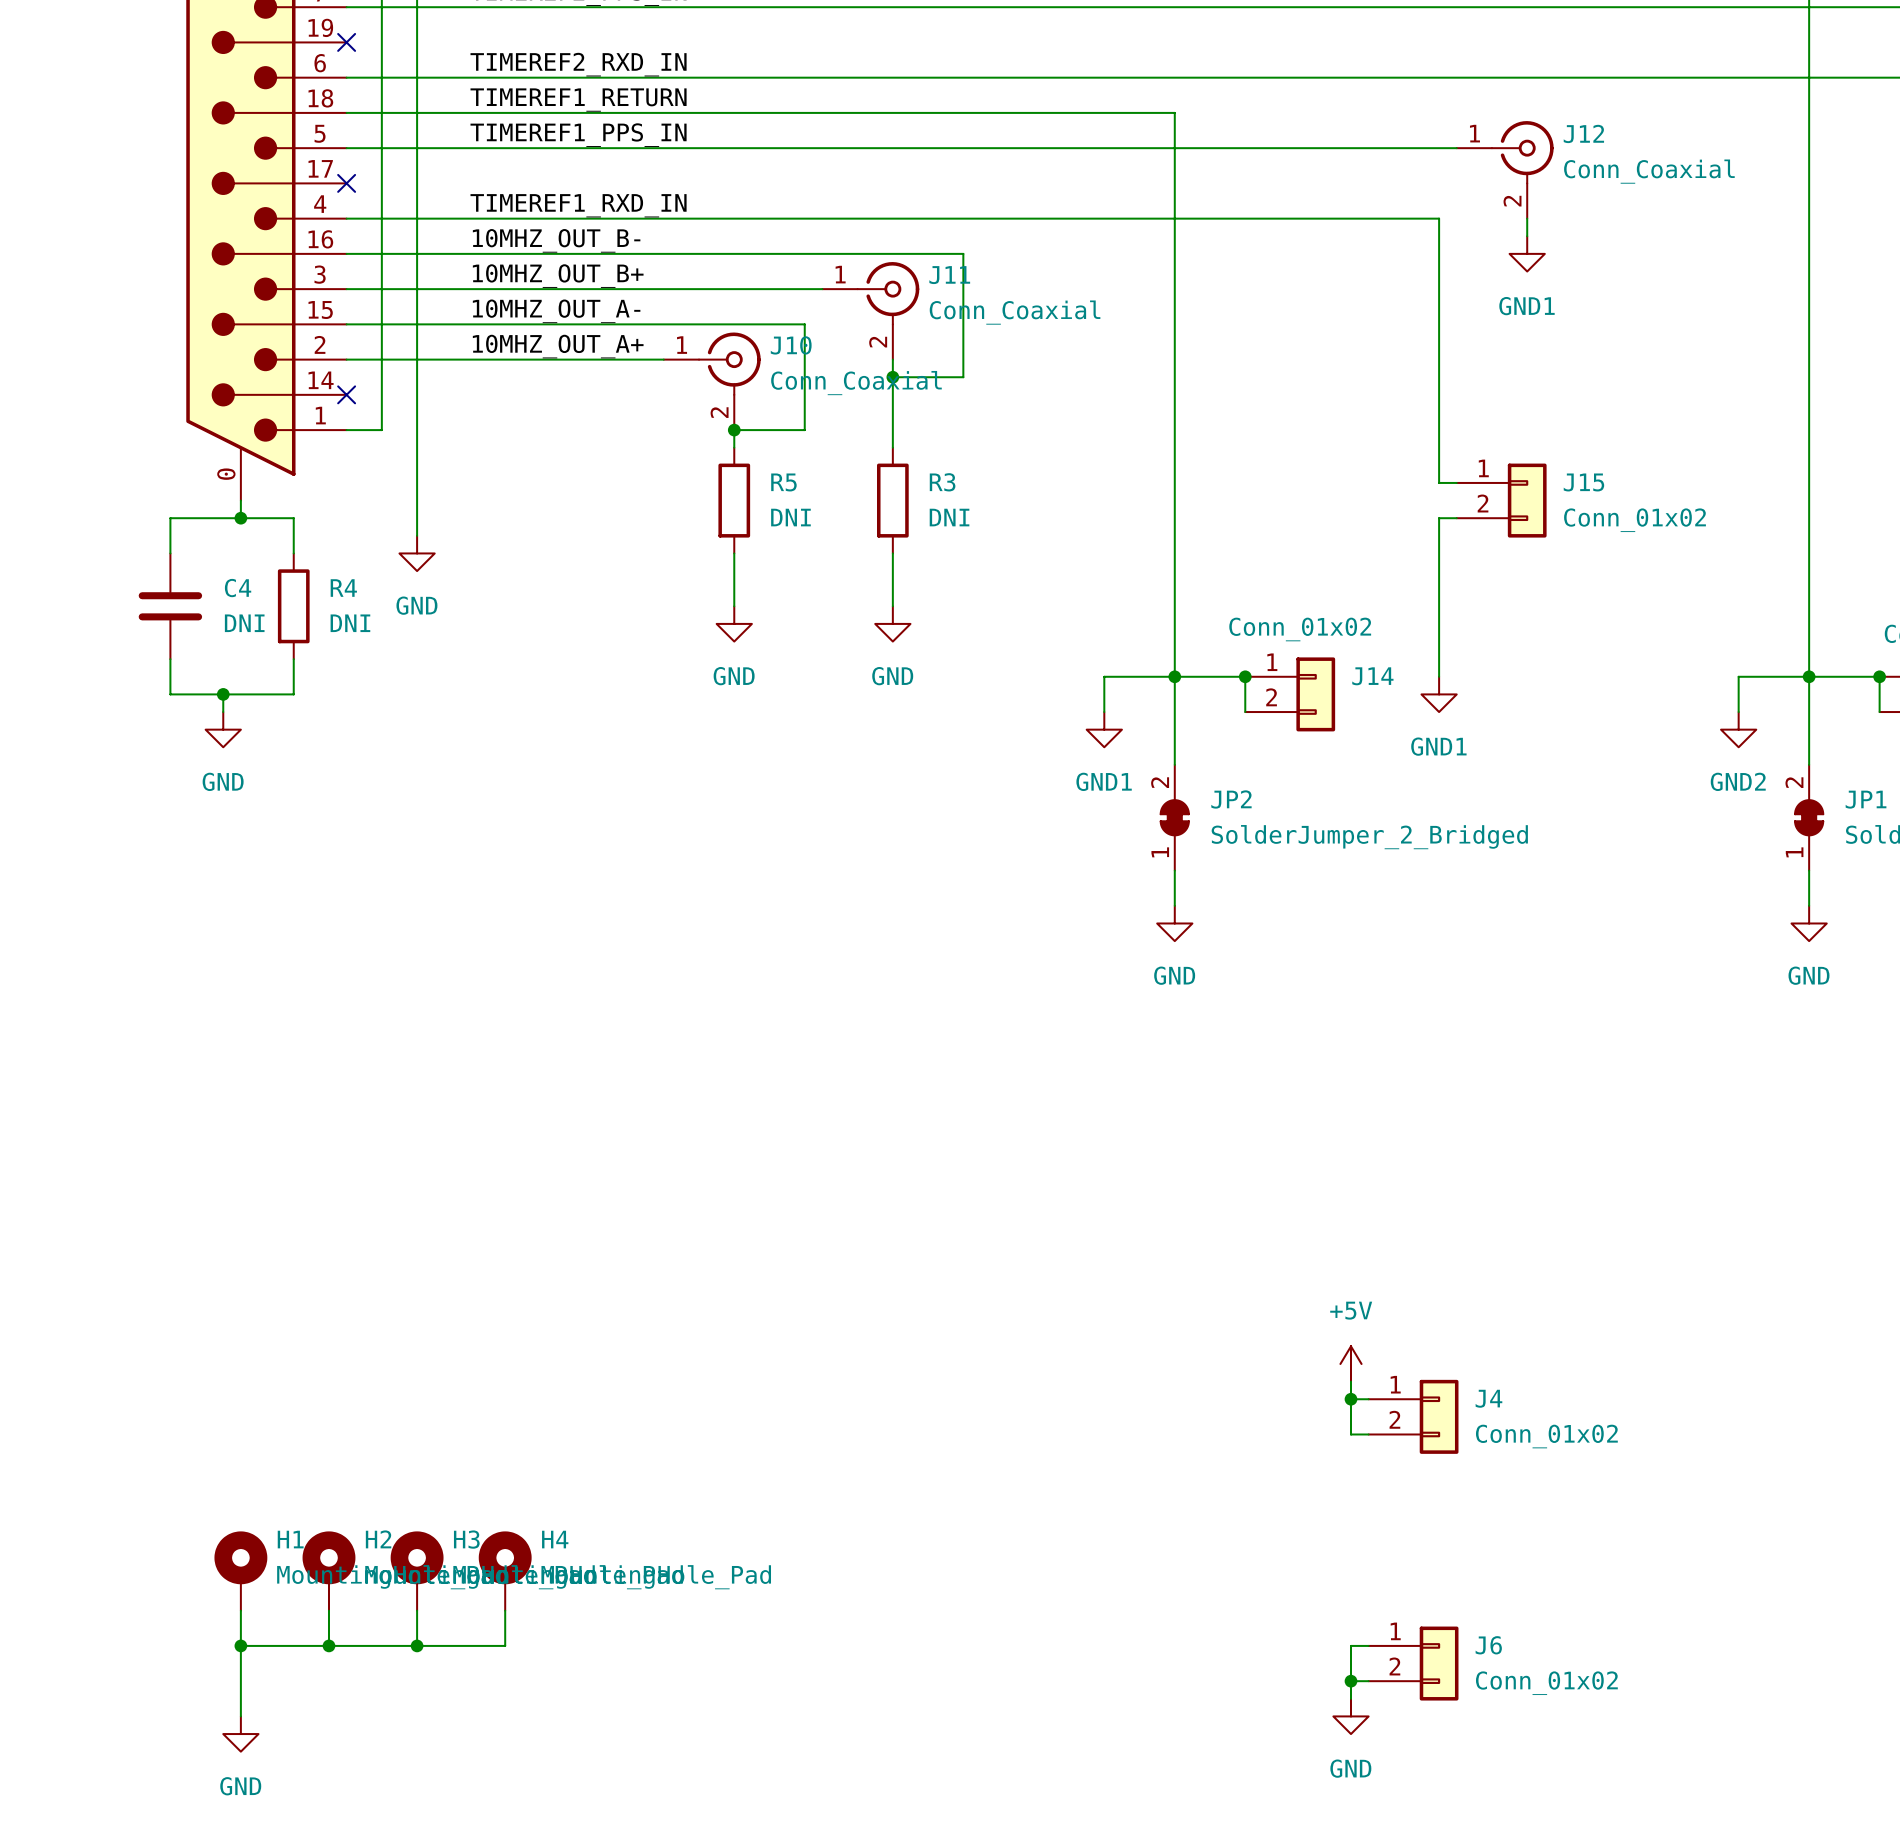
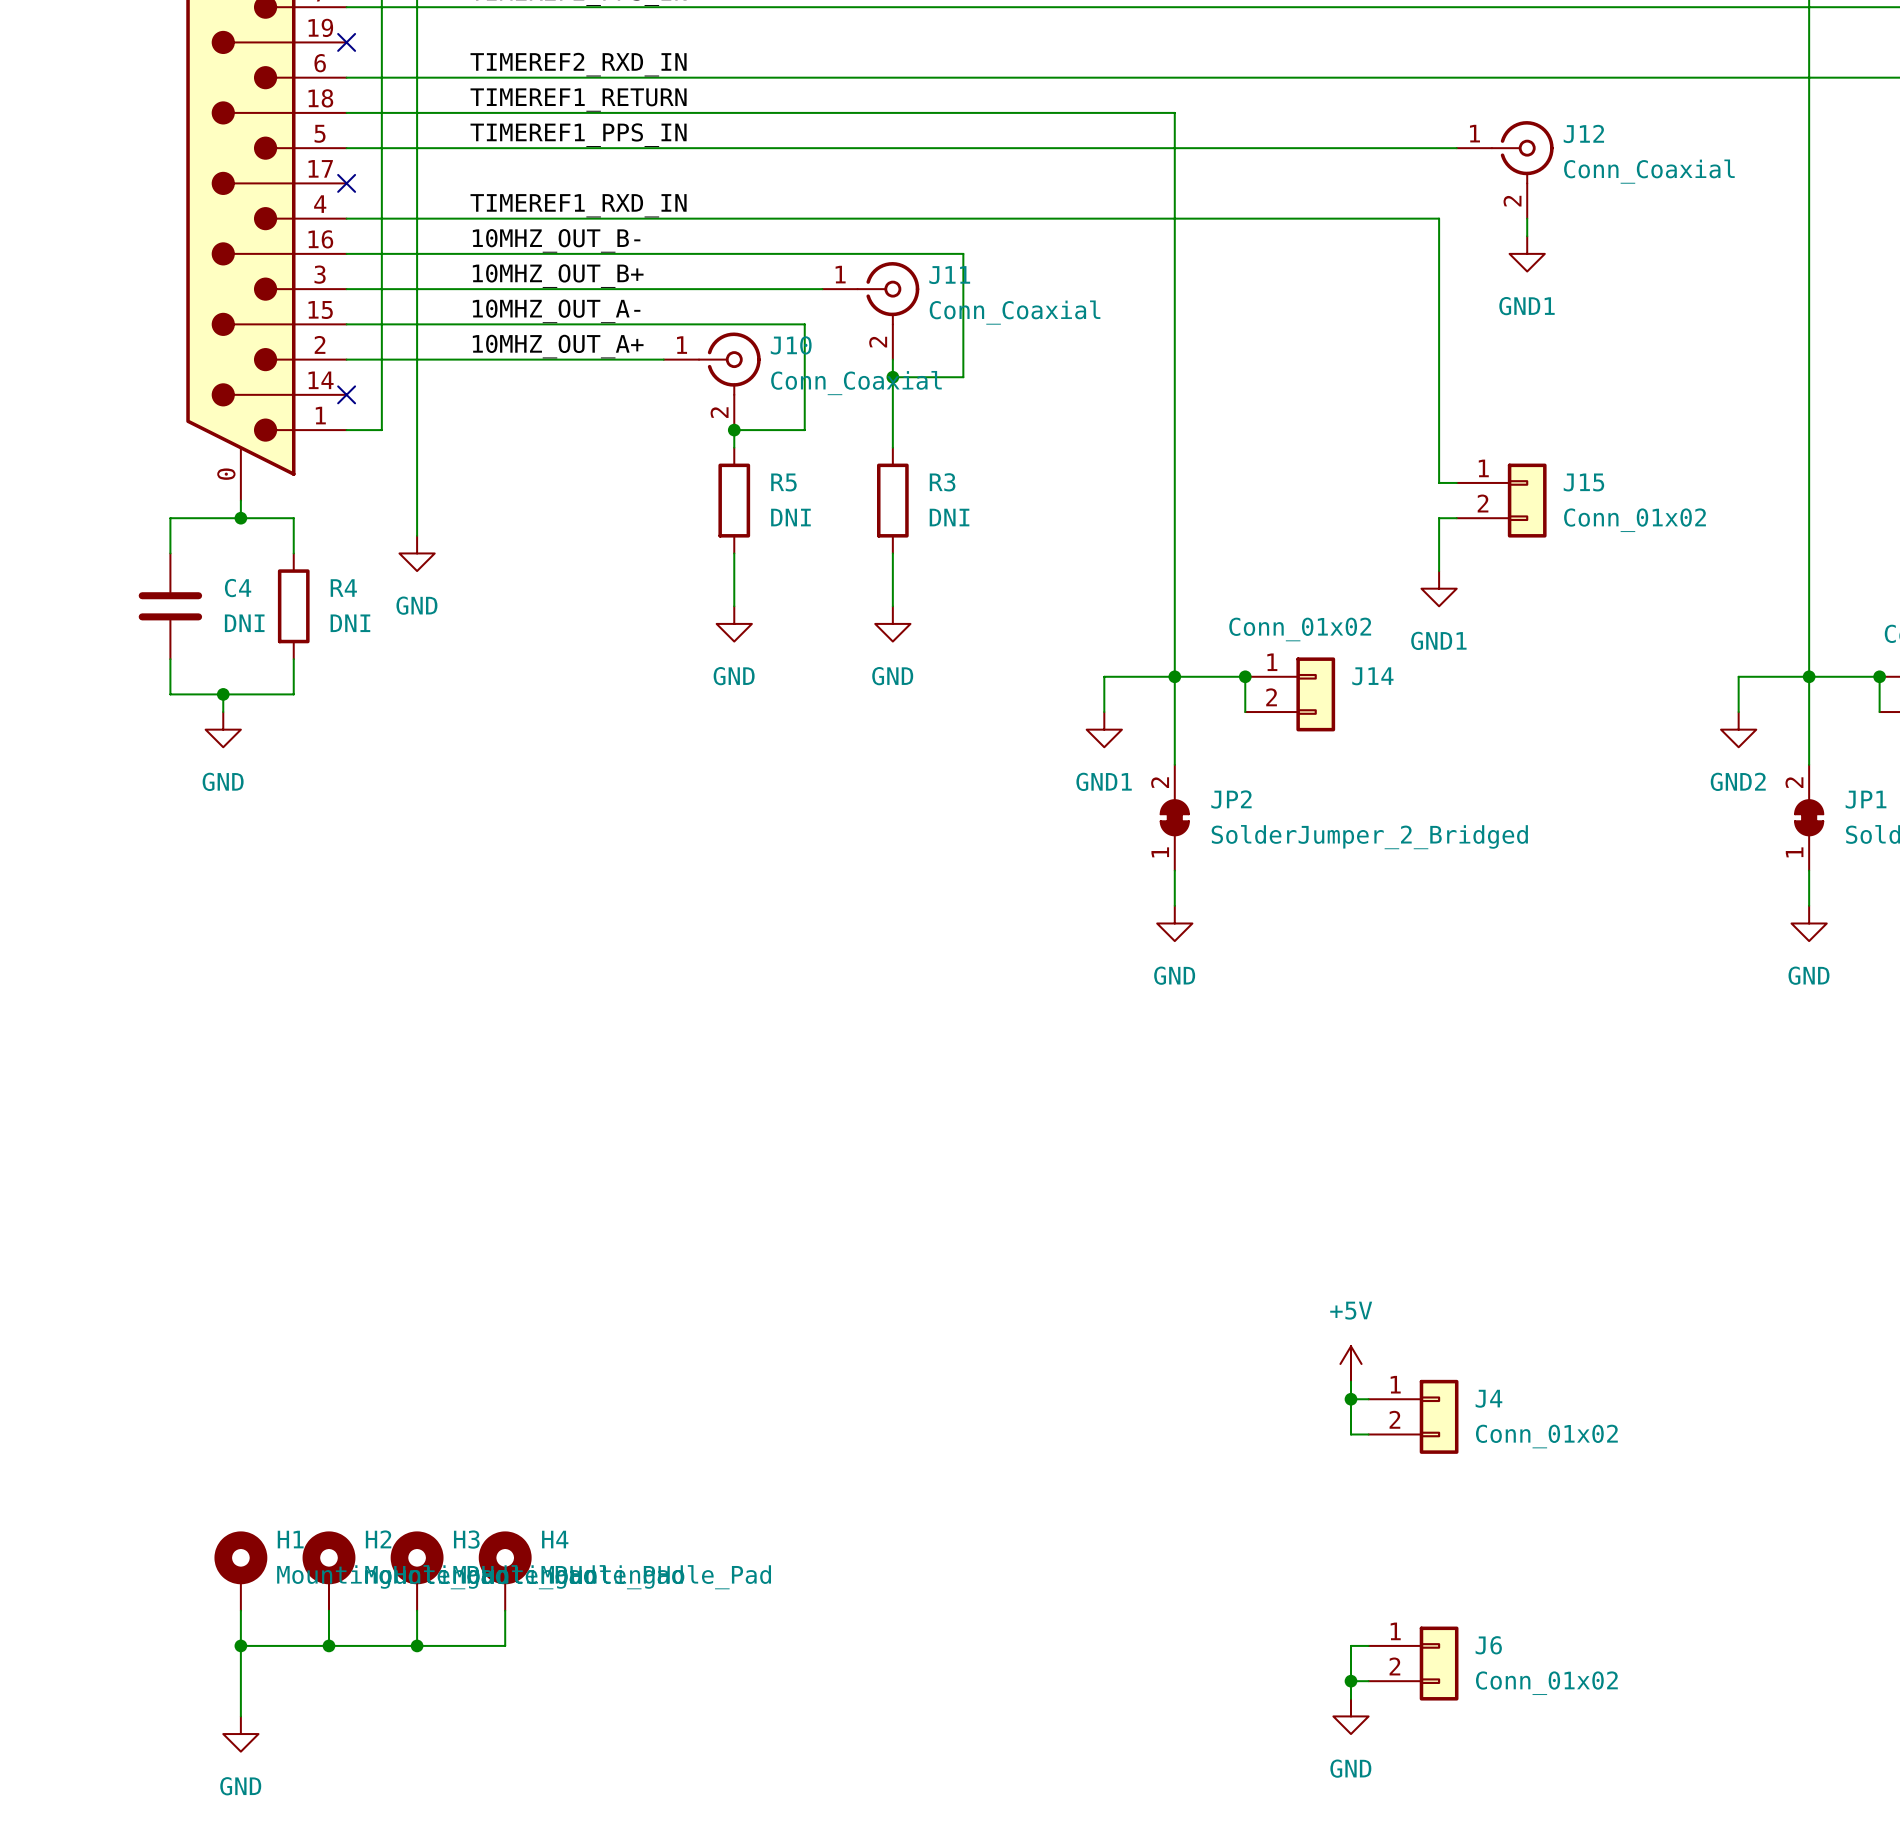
wire: (1439, 571) (1439, 676) -> none
power symbol position: GND1 (1439, 694) -> GND1 (1439, 588)

